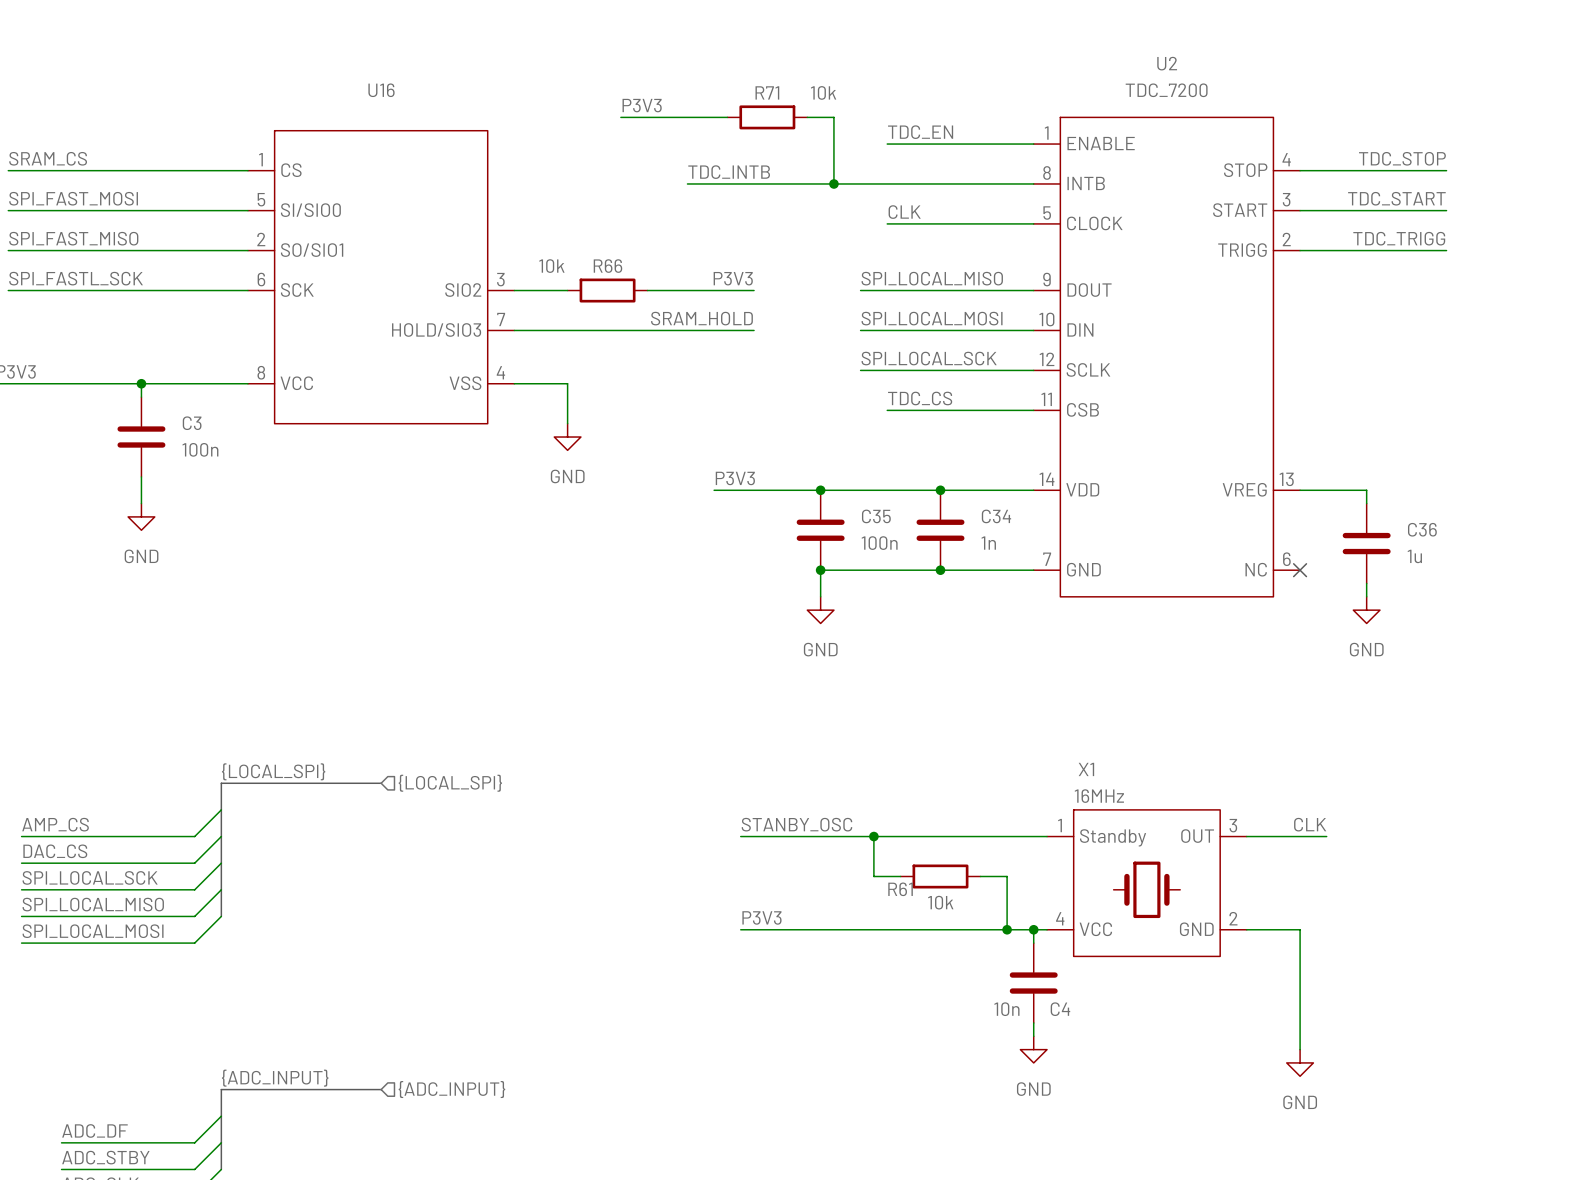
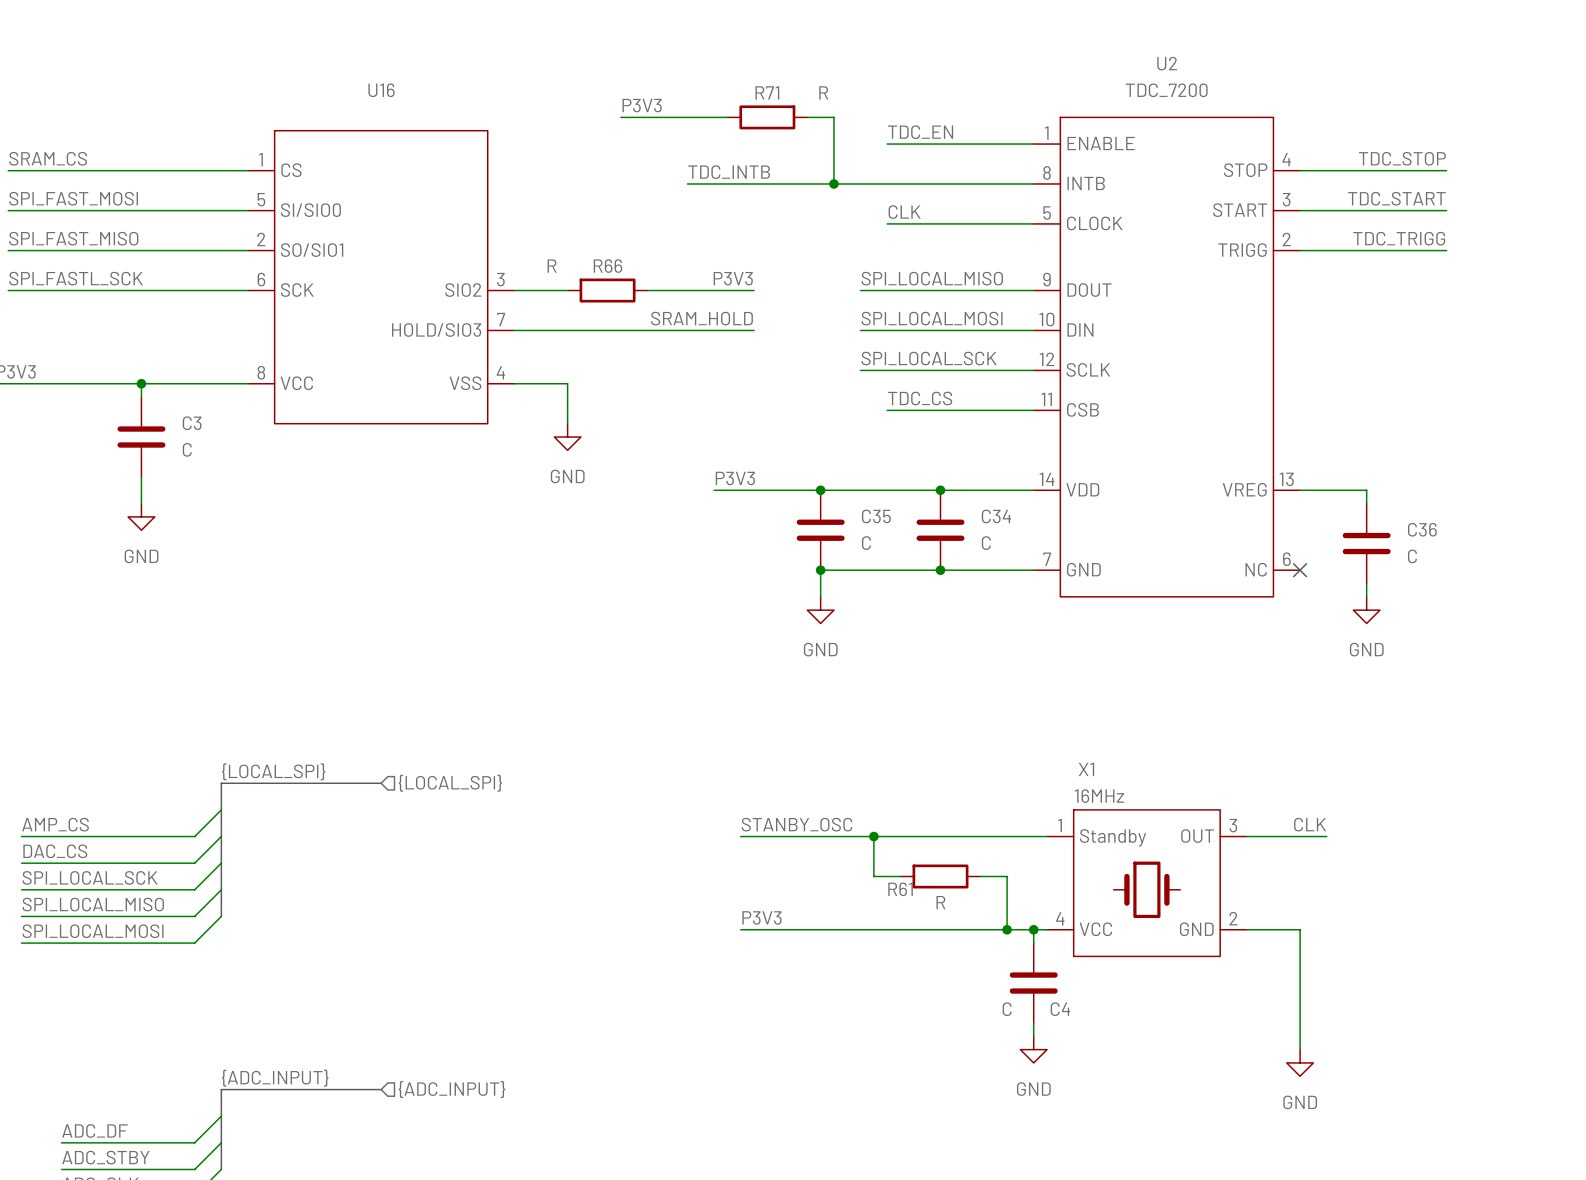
R71 value: 10k (823, 92) -> R (823, 92)
R66 value: 10k (551, 266) -> R (552, 266)
C3 value: 100n (200, 449) -> C (187, 449)
C35 value: 100n (879, 543) -> C (866, 543)
C34 value: 1n (988, 543) -> C (986, 543)
C36 value: 1u (1414, 556) -> C (1412, 556)
R61 value: 10k (940, 902) -> R (940, 902)
C4 value: 10n (1006, 1009) -> C (1007, 1009)

